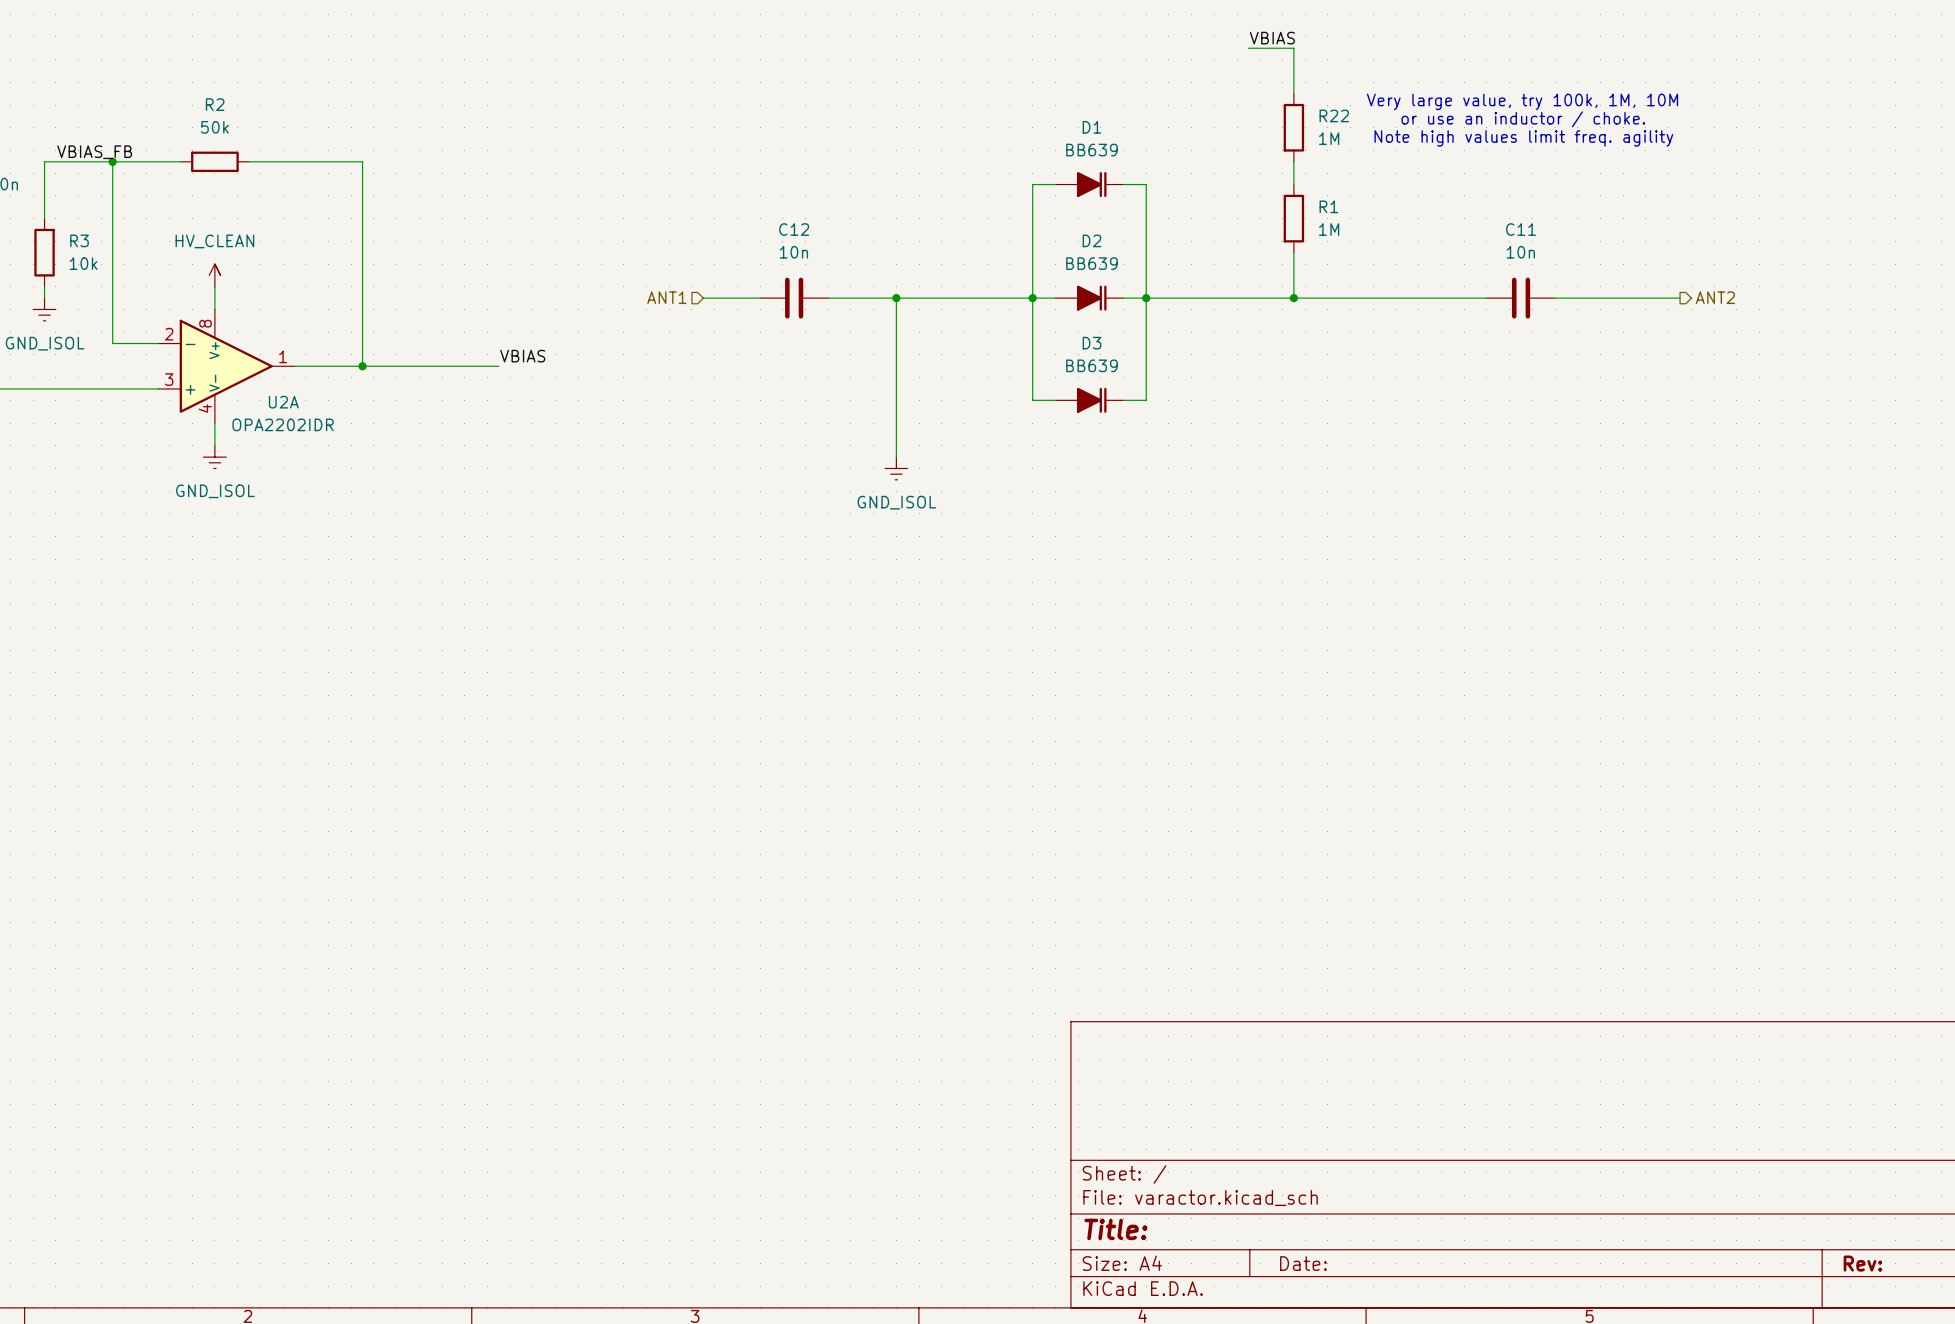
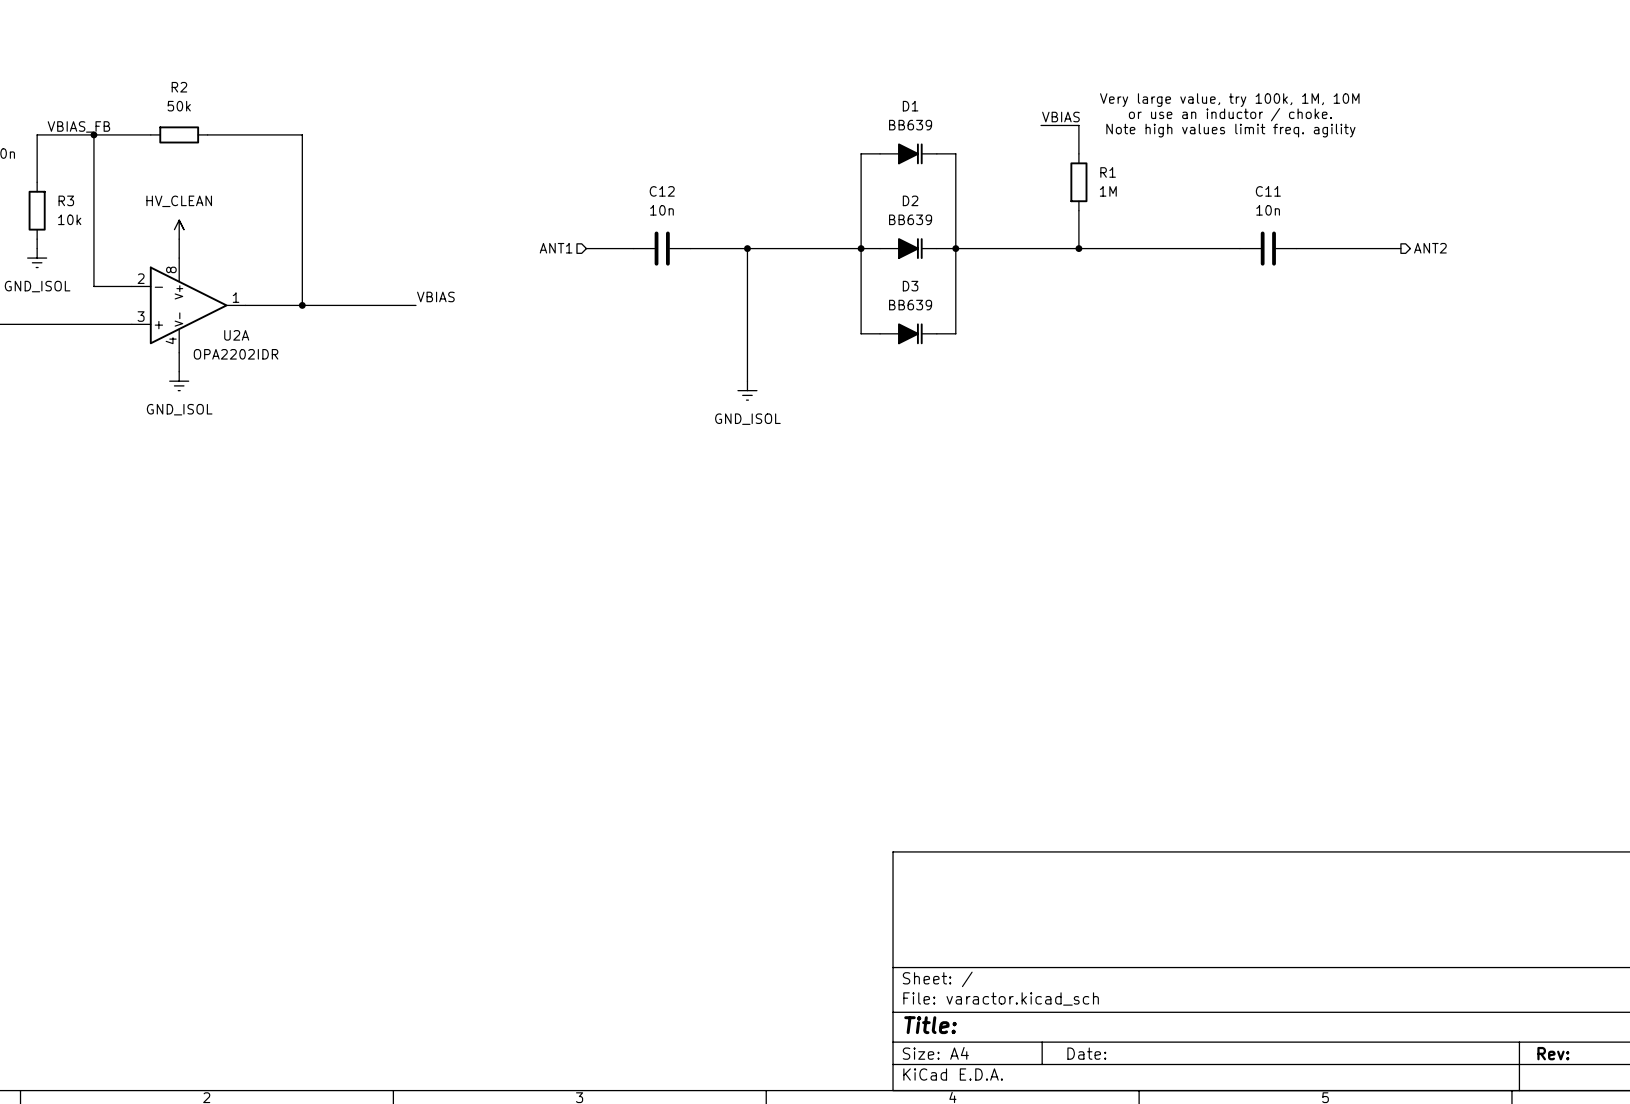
label position: VBIAS (1272, 38) -> VBIAS (1060, 117)
wire: (1248, 48) (1293, 48) (1293, 93) -> none
text position: Very large value, try 100k, 1M, 10M (1522, 101) -> Very large value, try 100k, 1M, 10M (1229, 100)
text position: or use an inductor / choke. (1523, 119) -> or use an inductor / choke. (1230, 114)
R22: 1M (1293, 127) -> none
text position: Note high values limit freq. agility (1523, 138) -> Note high values limit freq. agility (1230, 130)
wire: none -> (1041, 125) (1078, 125) (1078, 134)

